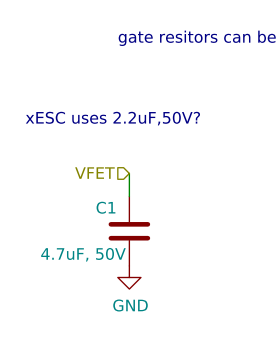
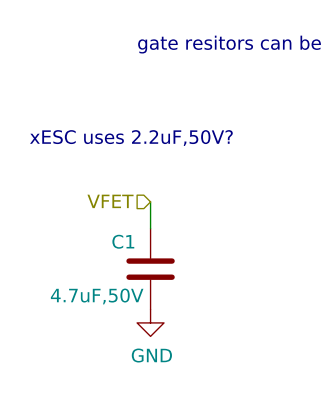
C1 value: 4.7uF, 50V (83, 254) -> 4.7uF,50V (97, 296)

